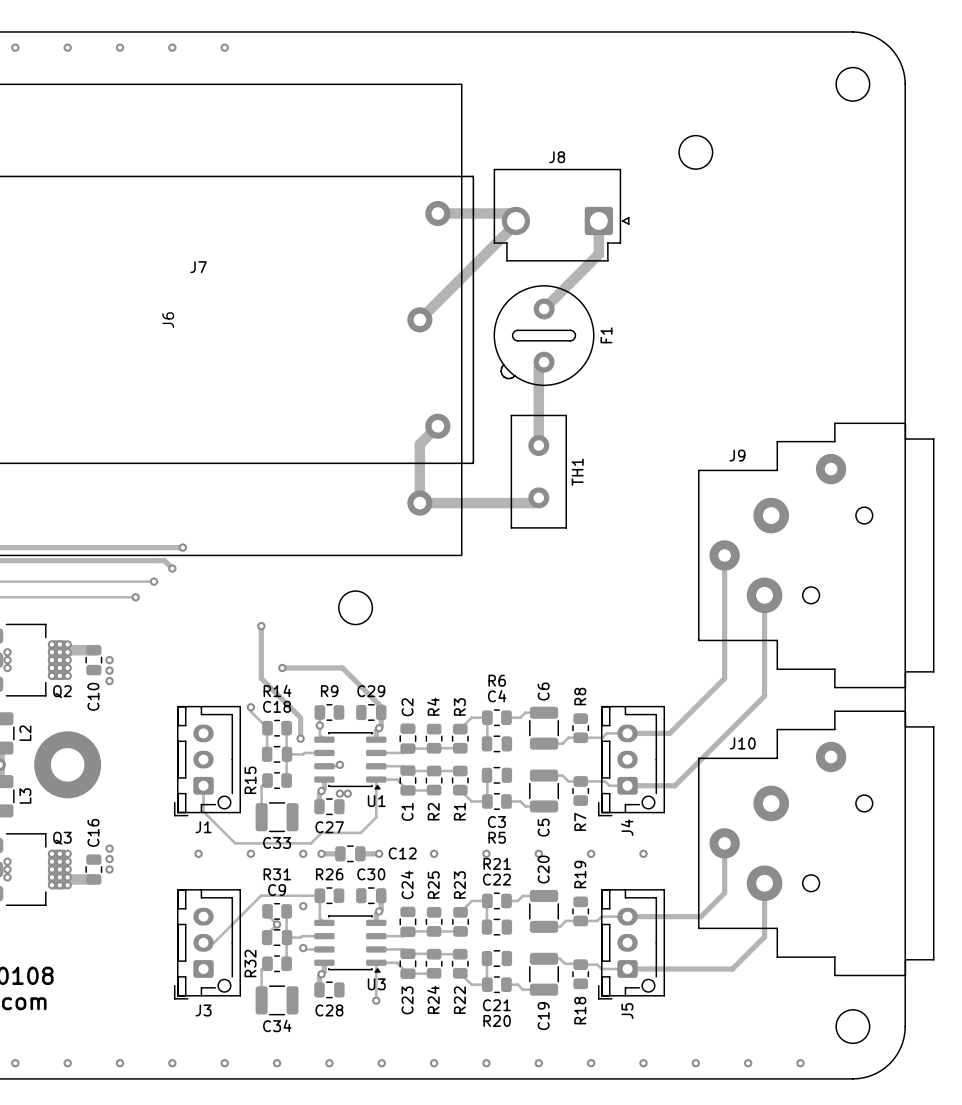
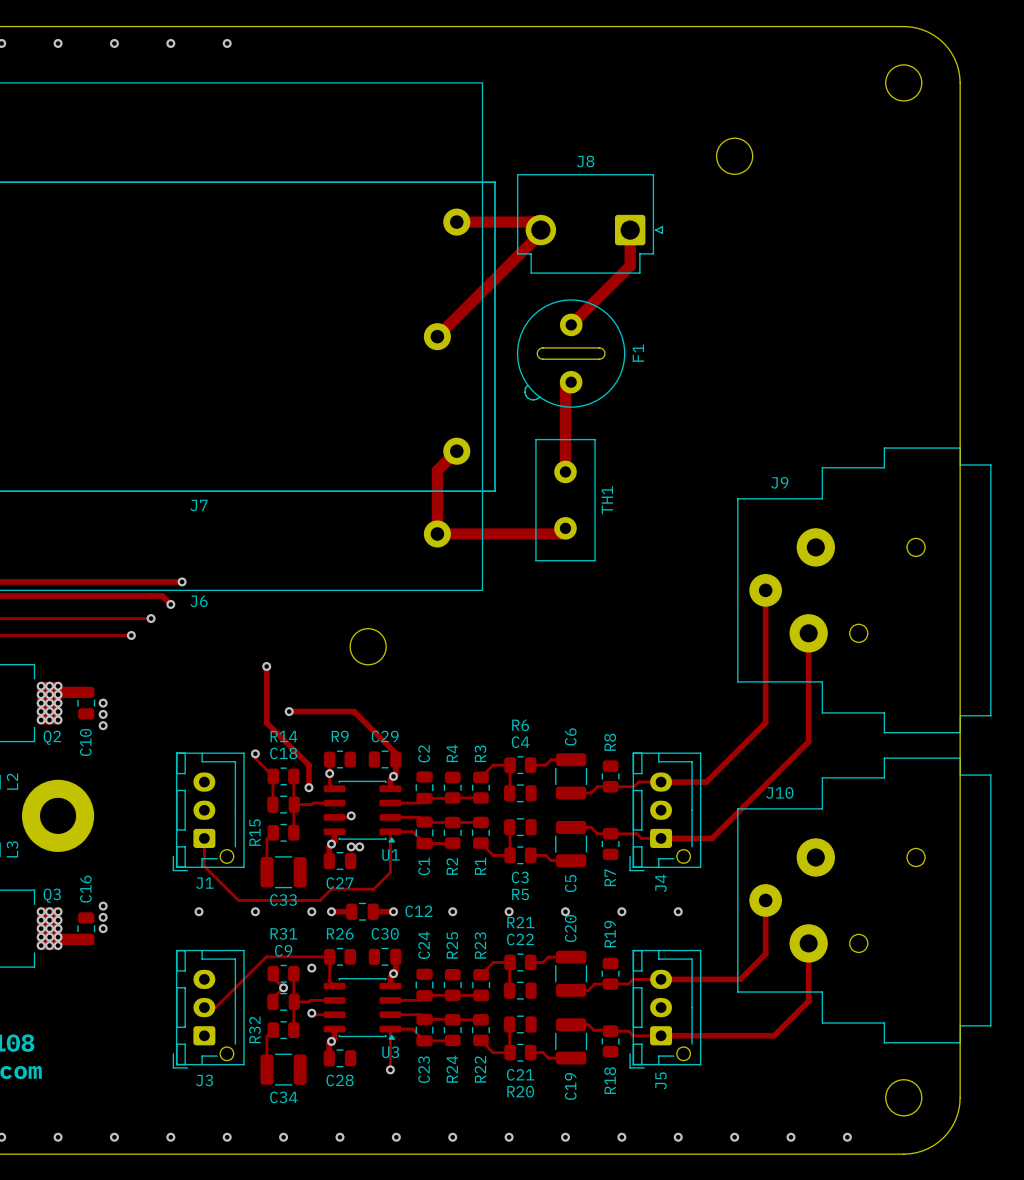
J7 name position: J7 (198, 267) -> J7 (199, 505)
J6 name rotation: 0° (168, 320) -> 90° clockwise (199, 601)
J6 name position: J6 (168, 320) -> J6 (199, 601)
J9 footprint: [698, 422, 935, 689] -> [737, 447, 992, 734]
J10 footprint: [698, 710, 935, 977] -> [737, 757, 992, 1044]

